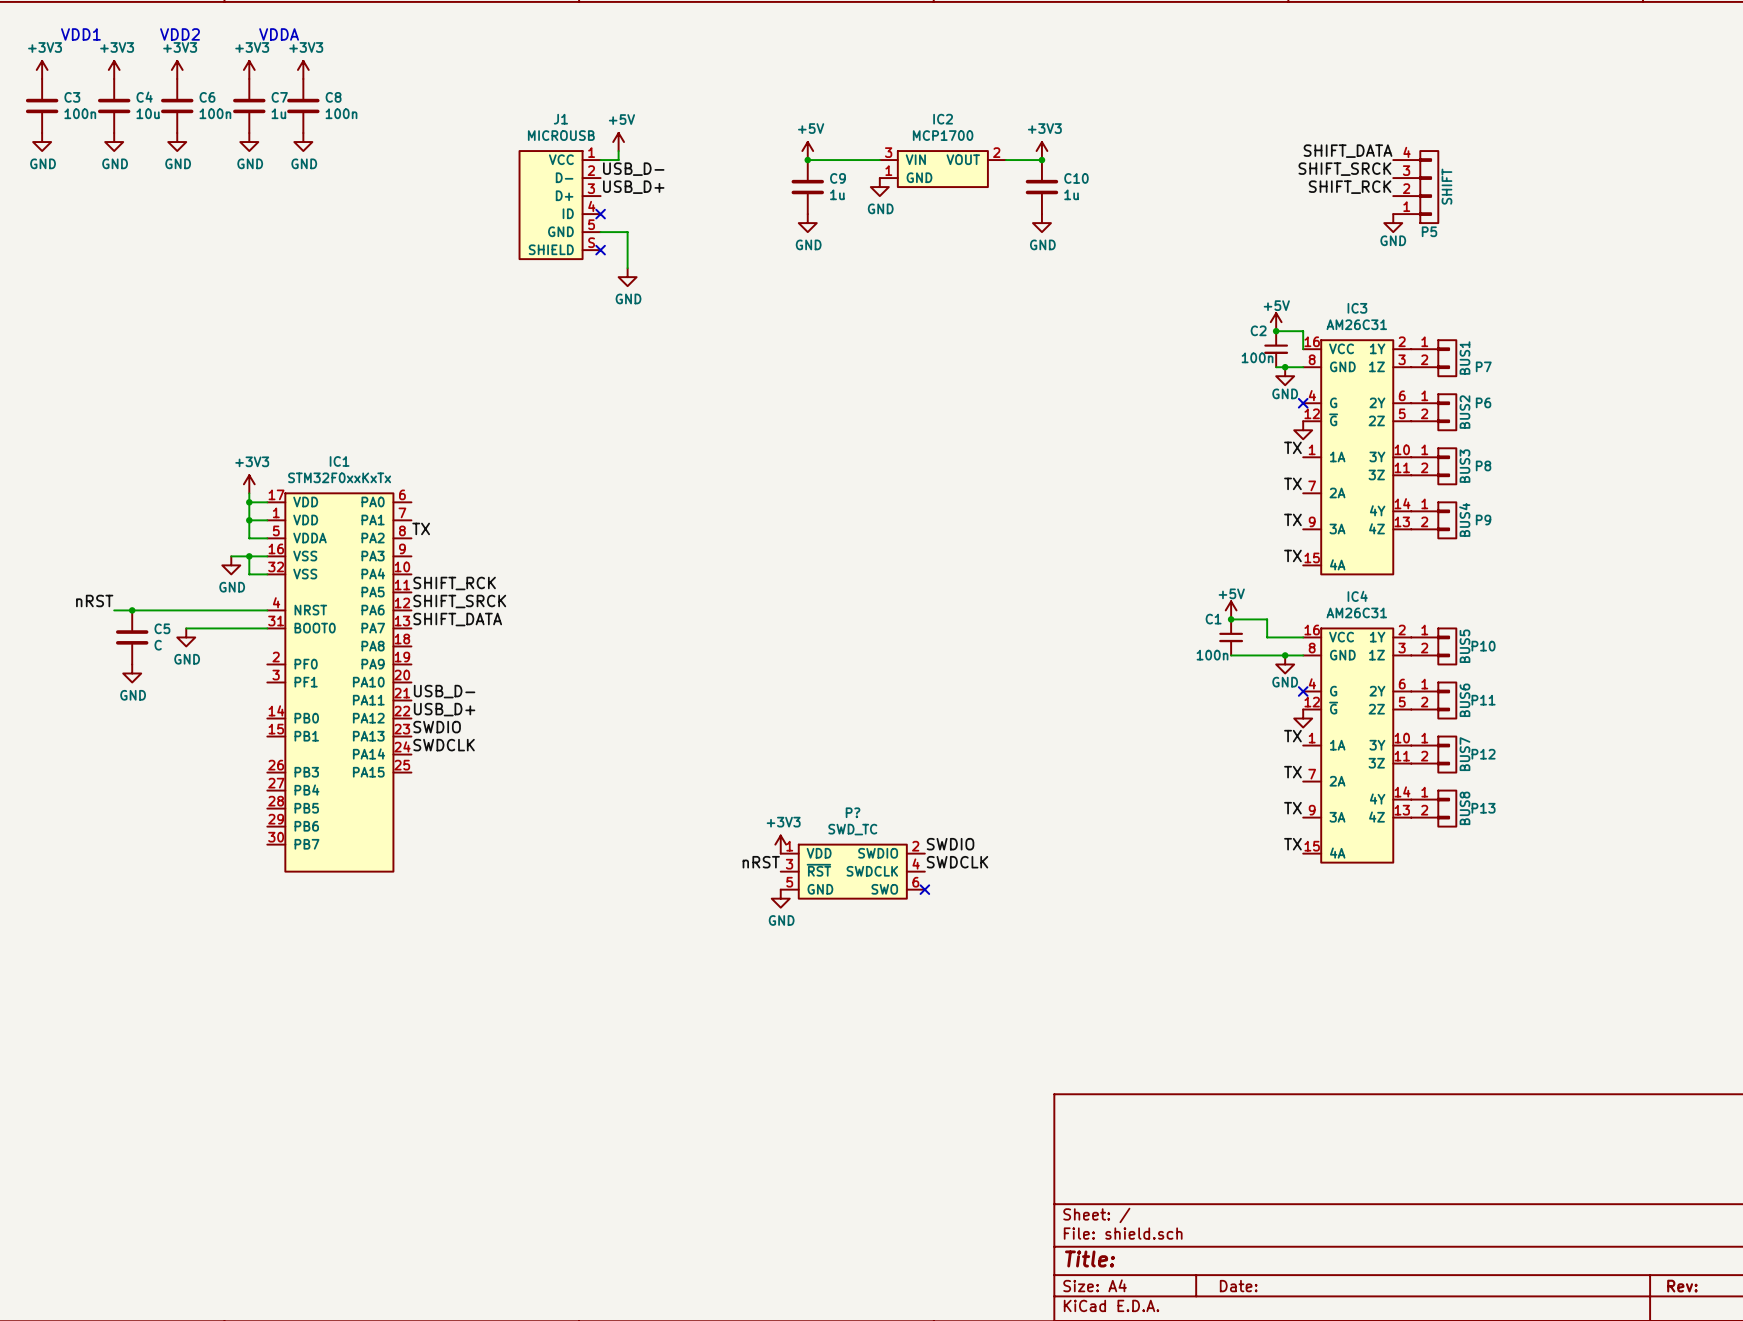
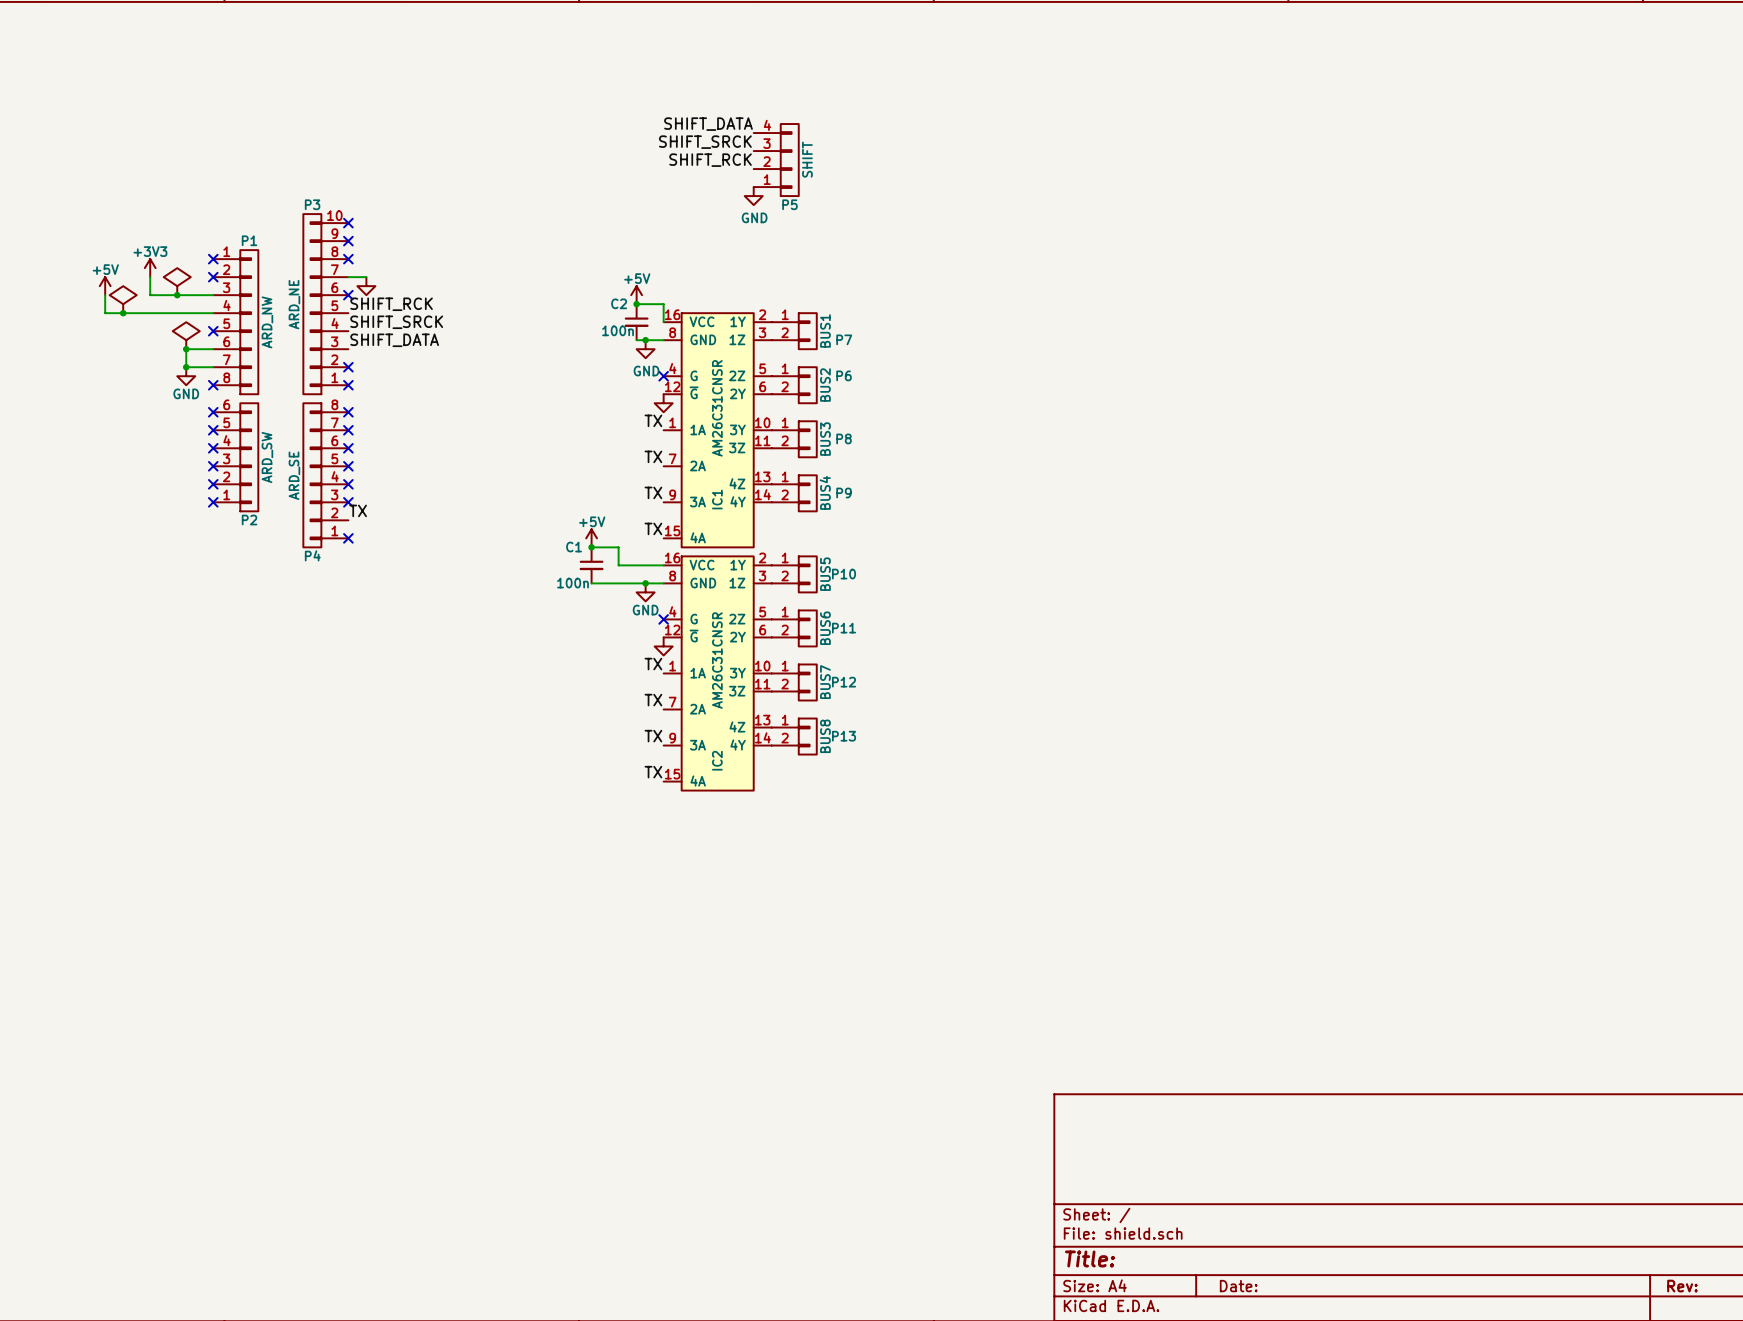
text: VDD1 (80, 34) -> none
text: VDD2 (180, 34) -> none
text: VDDA (279, 34) -> none
power symbol: +3V3 (42, 69) -> none
power symbol: +3V3 (114, 69) -> none
power symbol: +3V3 (177, 69) -> none
power symbol: +3V3 (249, 69) -> none
power symbol: +3V3 (303, 69) -> none
C3: 100n (42, 106) -> none
C4: 10u (114, 106) -> none
C6: 100n (177, 106) -> none
C7: 1u (249, 106) -> none
C8: 100n (303, 106) -> none
IC2 name position: IC2 (943, 119) -> IC2 (717, 760)
label: none -> SHIFT_DATA (708, 124)
IC2 value: MCP1700 (943, 135) -> AM26C31CNSR (717, 660)
power symbol: GND (42, 142) -> none
power symbol: GND (114, 142) -> none
power symbol: GND (177, 142) -> none
power symbol: GND (249, 142) -> none
power symbol: GND (303, 142) -> none
power symbol: +5V (618, 142) -> none
label: none -> SHIFT_SRCK (705, 142)
wire: (618, 151) (618, 160) (600, 160) -> none
power symbol: +5V (807, 151) -> none
IC2 symbol: [879, 151, 1006, 188] -> [663, 556, 772, 791]
power symbol: +3V3 (1041, 151) -> none
label: SHIFT_DATA (1348, 151) -> none
label: none -> SHIFT_RCK (710, 160)
wire: (807, 160) (879, 160) -> none
junction: (807, 160) -> none
wire: (1005, 160) (1041, 160) -> none
junction: (1041, 160) -> none
label: USB_D- (633, 169) -> none
label: SHIFT_SRCK (1344, 169) -> none
label: USB_D+ (633, 187) -> none
C9: 1u (807, 187) -> none
power symbol: GND (879, 187) -> none
C10: 1u (1041, 187) -> none
label: SHIFT_RCK (1350, 187) -> none
P5 position: (1415, 187) -> (776, 160)
J1: MICROUSB (560, 205) -> none
no-connect mark: (600, 214) -> none
no-connect mark: none -> (348, 223)
power symbol position: GND (807, 223) -> GND (753, 196)
power symbol: GND (1041, 223) -> none
power symbol: GND (1393, 223) -> none
wire: (600, 232) (627, 232) (627, 268) -> none
no-connect mark: none -> (348, 241)
no-connect mark: (600, 250) -> none
no-connect mark: none -> (213, 259)
no-connect mark: none -> (348, 259)
power symbol: none -> +3V3 (150, 268)
wire: none -> (150, 277) (150, 295) (213, 295)
no-connect mark: none -> (213, 277)
wire: none -> (348, 277) (366, 277)
power symbol position: GND (627, 277) -> GND (645, 349)
power symbol: none -> (177, 281)
power symbol: none -> +5V (105, 286)
power symbol: none -> (366, 286)
wire: none -> (105, 295) (105, 313) (213, 313)
junction: none -> (177, 295)
no-connect mark: none -> (348, 295)
power symbol: none -> +5V (636, 295)
power symbol: none -> (123, 299)
P3: none -> ARD_NE (325, 304)
label: none -> SHIFT_RCK (391, 304)
wire: none -> (636, 304) (663, 304) (663, 322)
junction: none -> (636, 304)
junction: none -> (123, 313)
P1: none -> ARD_NW (235, 322)
label: none -> SHIFT_SRCK (396, 322)
power symbol: +5V (1276, 322) -> none
no-connect mark: none -> (213, 331)
wire: (1276, 331) (1303, 331) (1303, 349) -> none
junction: (1276, 331) -> none
power symbol: none -> (186, 335)
label: none -> SHIFT_DATA (394, 340)
wire: none -> (636, 340) (663, 340)
junction: none -> (645, 340)
junction: none -> (186, 349)
wire: none -> (213, 349) (186, 349) (186, 367) (213, 367)
C2 position: (1276, 349) -> (636, 322)
P6 position: (1433, 358) -> (794, 331)
junction: none -> (186, 367)
no-connect mark: none -> (348, 367)
wire: (1276, 367) (1303, 367) -> none
junction: (1285, 367) -> none
power symbol: none -> GND (186, 376)
no-connect mark: none -> (663, 376)
power symbol: GND (1285, 376) -> none
no-connect mark: none -> (213, 385)
no-connect mark: none -> (348, 385)
power symbol: none -> (663, 403)
no-connect mark: (1303, 403) -> none
no-connect mark: none -> (213, 412)
no-connect mark: none -> (348, 412)
P7 position: (1433, 412) -> (794, 385)
label: none -> TX (653, 420)
no-connect mark: none -> (213, 430)
no-connect mark: none -> (348, 430)
power symbol: (1303, 430) -> none
label: TX (1292, 447) -> none
no-connect mark: none -> (213, 448)
no-connect mark: none -> (348, 448)
label: none -> TX (653, 456)
P2: none -> ARD_SW (235, 457)
IC3: AM26C31 (1357, 457) -> none
IC1 name position: IC1 (339, 461) -> IC1 (717, 499)
no-connect mark: none -> (213, 466)
no-connect mark: none -> (348, 466)
P8 position: (1433, 466) -> (794, 439)
P4: none -> ARD_SE (325, 475)
IC1 value: STM32F0xxKxTx (339, 477) -> AM26C31CNSR (717, 408)
label: TX (1292, 483) -> none
no-connect mark: none -> (213, 484)
power symbol: +3V3 (249, 484) -> none
no-connect mark: none -> (348, 484)
label: none -> TX (653, 492)
wire: (249, 493) (249, 538) (267, 538) -> none
IC1 symbol: [267, 493, 412, 872] -> [663, 313, 772, 548]
no-connect mark: none -> (213, 502)
wire: (249, 502) (267, 502) -> none
junction: (249, 502) -> none
no-connect mark: none -> (348, 502)
label: TX (1292, 519) -> none
wire: (249, 520) (267, 520) -> none
junction: (249, 520) -> none
P9 position: (1433, 520) -> (794, 493)
label position: TX (421, 528) -> TX (358, 510)
label: none -> TX (653, 528)
no-connect mark: none -> (348, 538)
power symbol: none -> +5V (591, 538)
wire: none -> (591, 547) (618, 547) (618, 565) (663, 565)
junction: none -> (591, 547)
label: TX (1292, 555) -> none
wire: (231, 556) (267, 556) -> none
wire: (249, 556) (249, 574) (267, 574) -> none
junction: (249, 556) -> none
power symbol: GND (231, 565) -> none
label: SHIFT_RCK (454, 583) -> none
wire: none -> (591, 583) (663, 583)
junction: none -> (645, 583)
power symbol: none -> GND (645, 592)
label: nRST (94, 600) -> none
label: SHIFT_SRCK (459, 601) -> none
wire: (114, 610) (267, 610) -> none
junction: (132, 610) -> none
power symbol: +5V (1231, 610) -> none
label: SHIFT_DATA (457, 619) -> none
no-connect mark: none -> (663, 619)
wire: (1231, 619) (1267, 619) (1267, 637) (1303, 637) -> none
junction: (1231, 619) -> none
wire: (186, 628) (267, 628) -> none
C5: C (132, 637) -> none
power symbol: GND (186, 637) -> none
C1 position: (1231, 637) -> (591, 565)
power symbol: none -> (663, 646)
P10 position: (1433, 646) -> (794, 574)
wire: (1231, 655) (1303, 655) -> none
junction: (1285, 655) -> none
label: none -> TX (653, 664)
power symbol: GND (1285, 664) -> none
power symbol: GND (132, 673) -> none
label: USB_D- (444, 691) -> none
no-connect mark: (1303, 691) -> none
label: none -> TX (653, 700)
P11 position: (1433, 700) -> (794, 628)
label: USB_D+ (444, 709) -> none
power symbol: (1303, 718) -> none
label: SWDIO (437, 727) -> none
label: none -> TX (653, 736)
label: TX (1292, 736) -> none
label: SWDCLK (444, 745) -> none
IC4: AM26C31 (1357, 745) -> none
P12 position: (1433, 754) -> (794, 682)
label: none -> TX (653, 772)
label: TX (1292, 772) -> none
label: TX (1292, 808) -> none
P13 position: (1433, 808) -> (794, 736)
power symbol: +3V3 (780, 844) -> none
label: SWDIO (950, 844) -> none
label: TX (1292, 844) -> none
label: nRST (761, 862) -> none
label: SWDCLK (957, 862) -> none
P?: SWD_TC (852, 871) -> none
no-connect mark: (924, 889) -> none
power symbol: GND (780, 898) -> none

